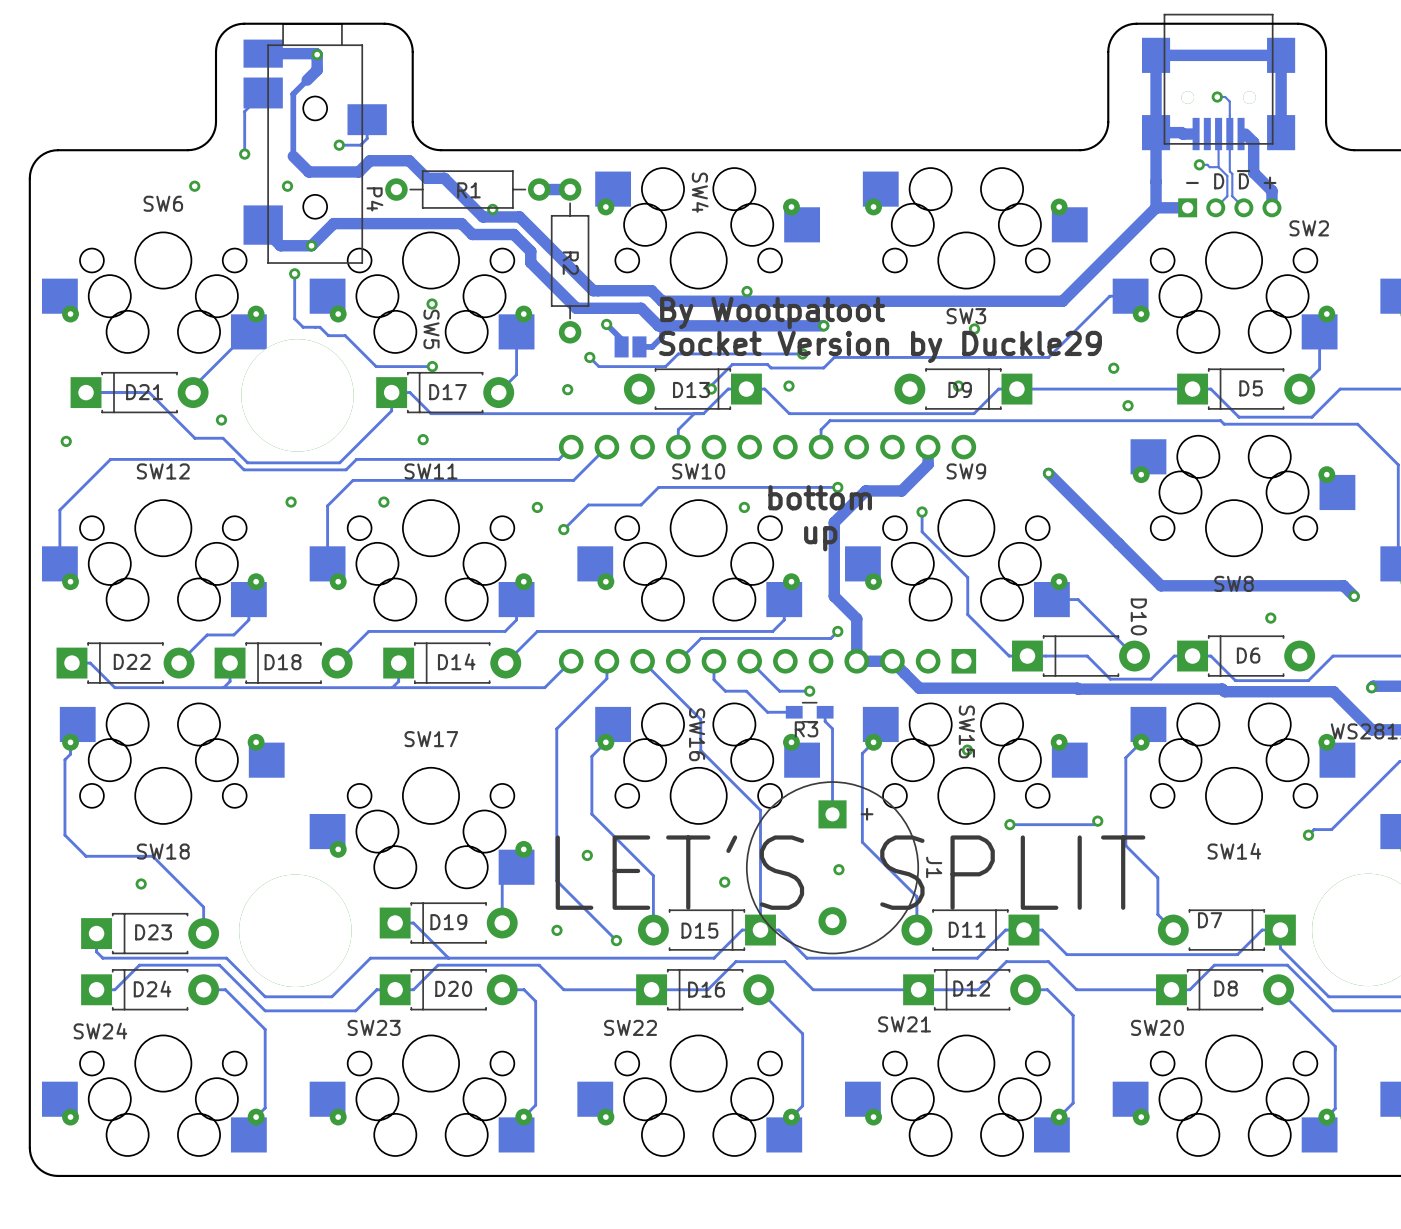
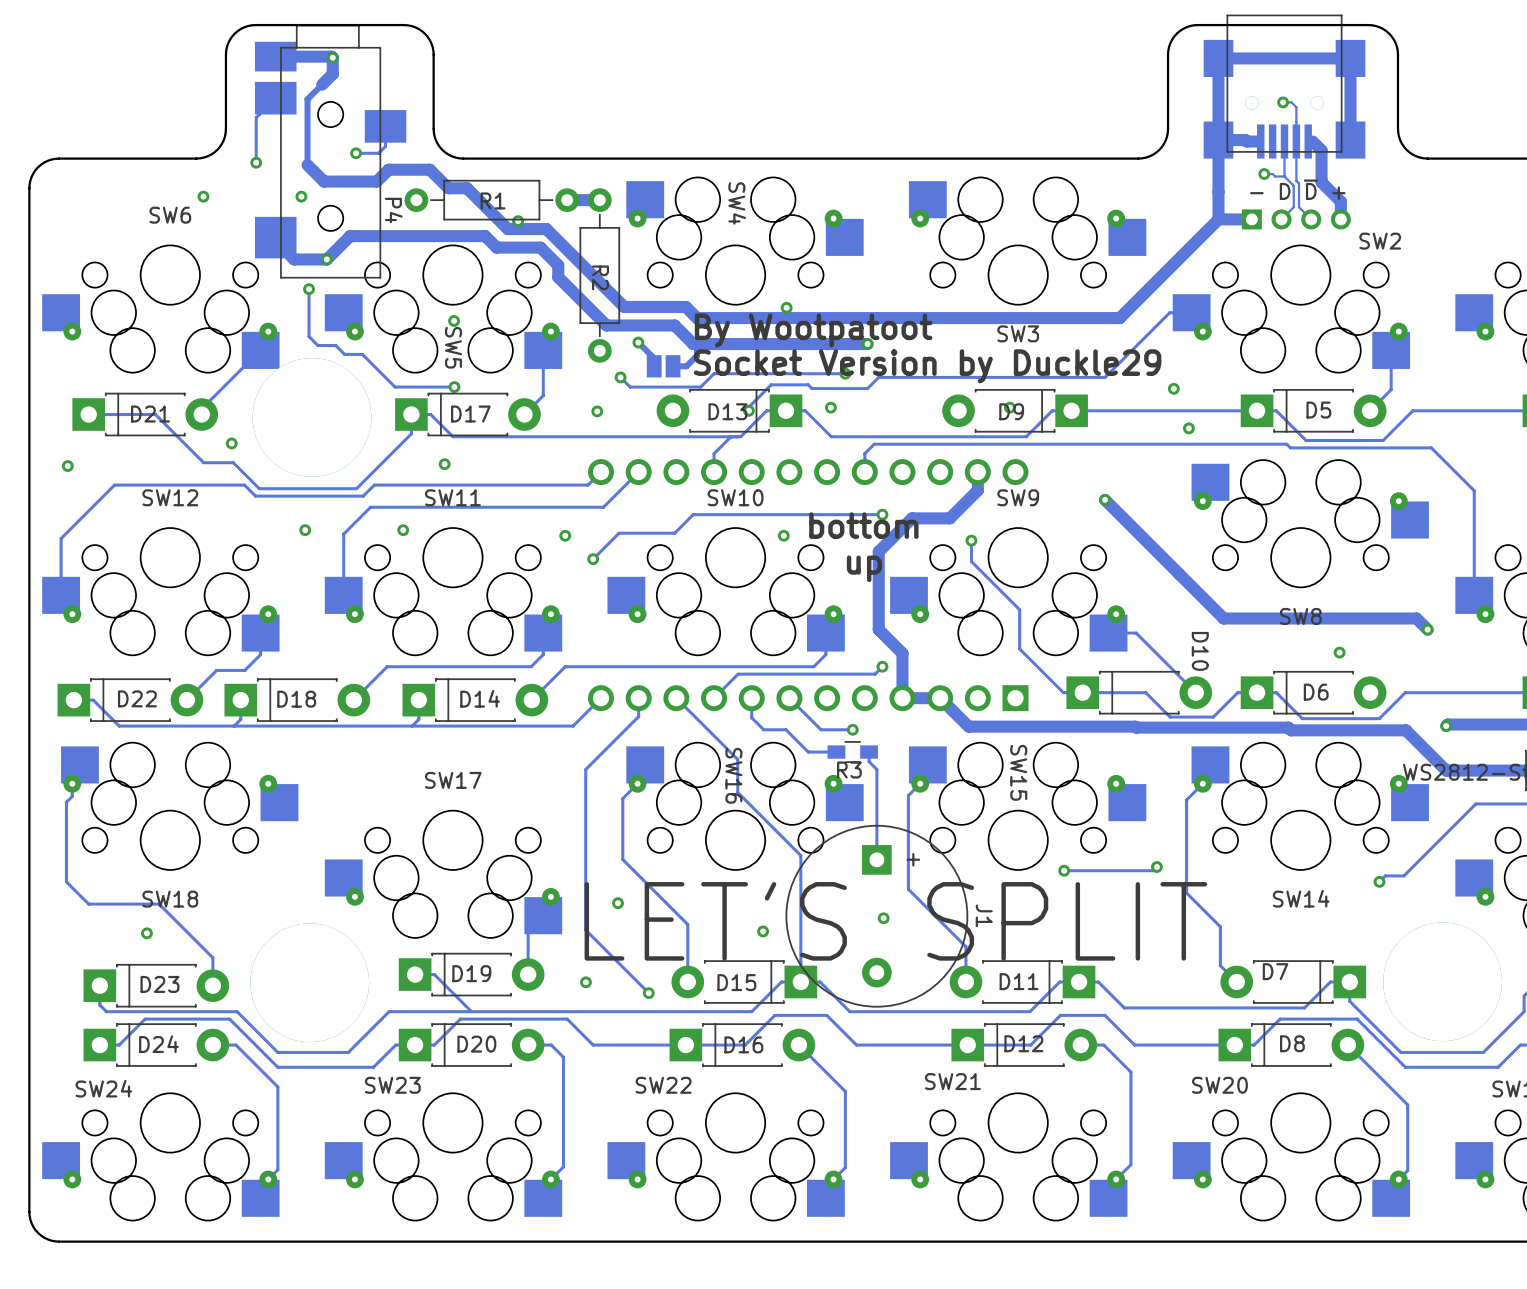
via: (974, 328) -> none
via: (967, 750) -> none

